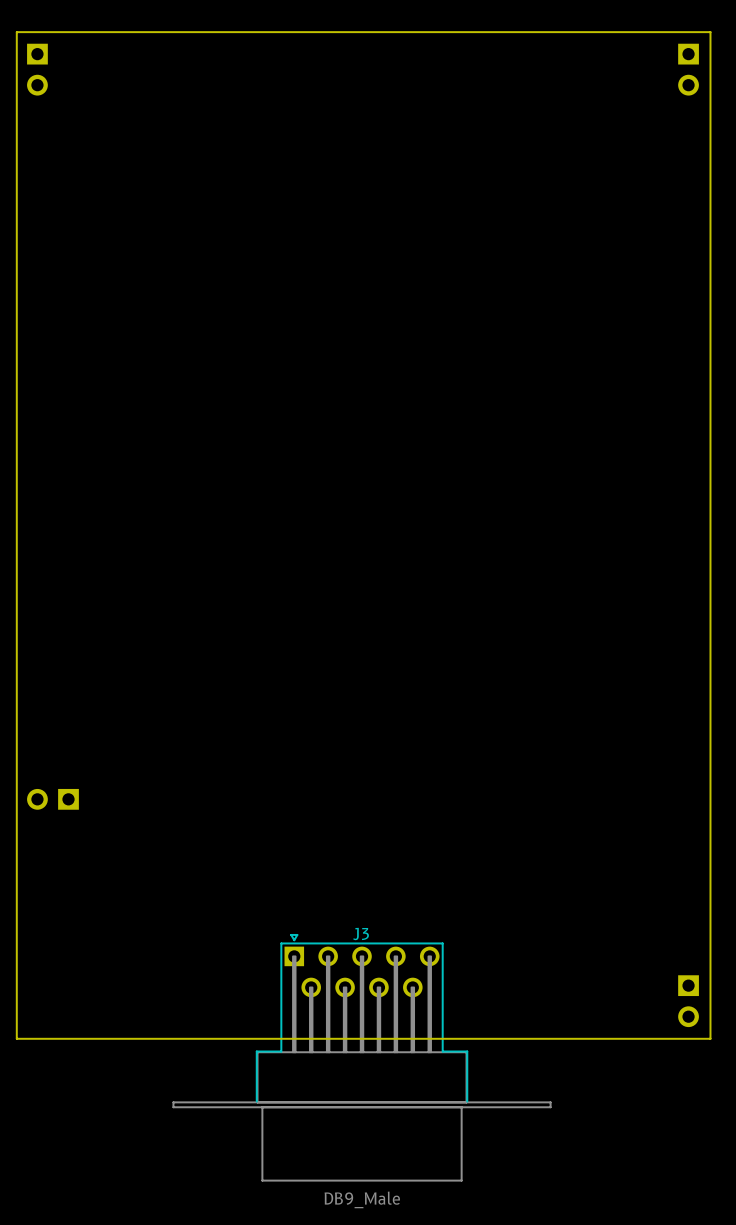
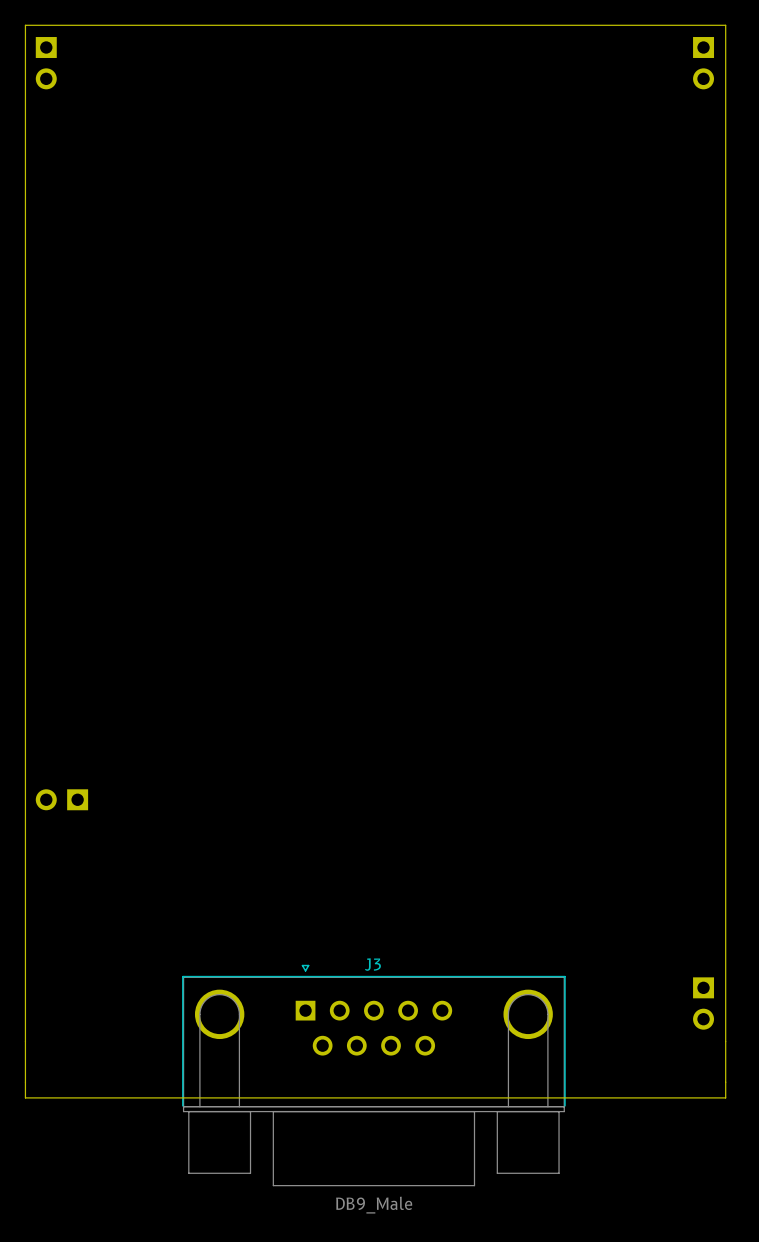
J3 footprint: [172, 934, 552, 1182] -> [182, 964, 566, 1187]
board edge: (710, 1038) (16, 1038) -> (725, 1041) (725, 1097) (25, 1097) (25, 1041)

